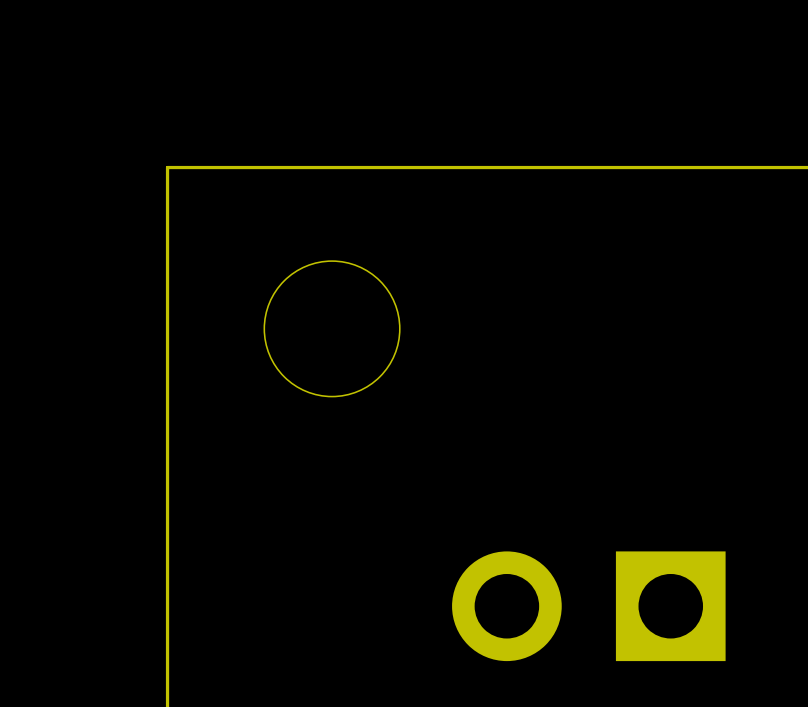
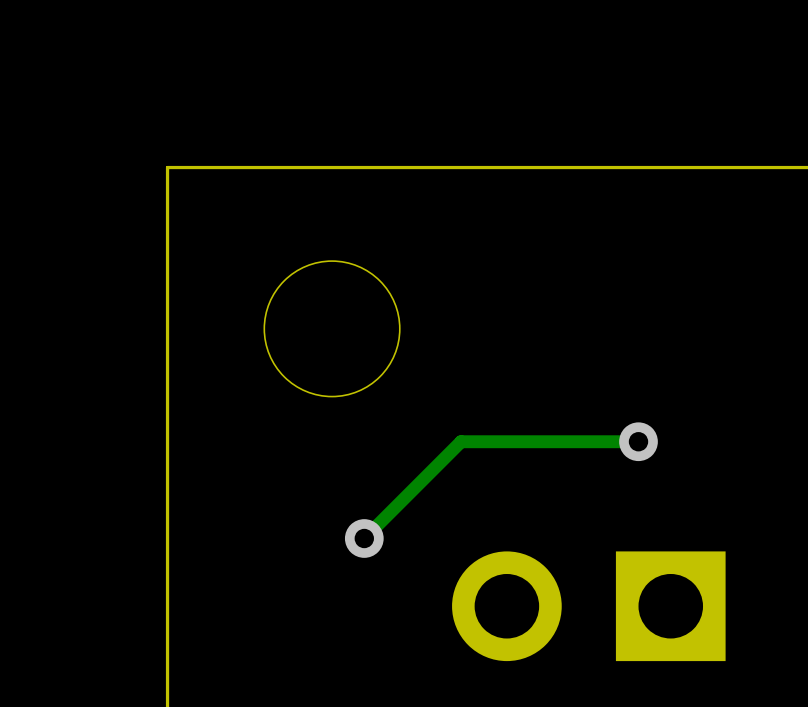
track: none -> (638, 441) (461, 441) (364, 538)
via: none -> (638, 441)
via: none -> (364, 538)

